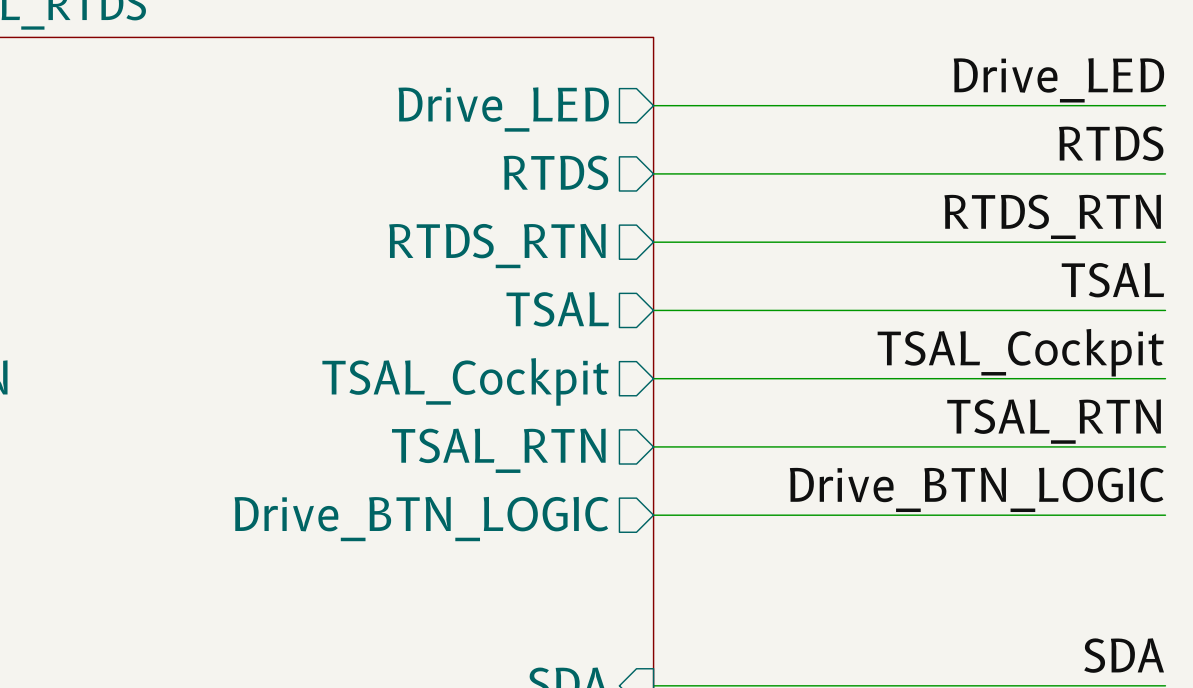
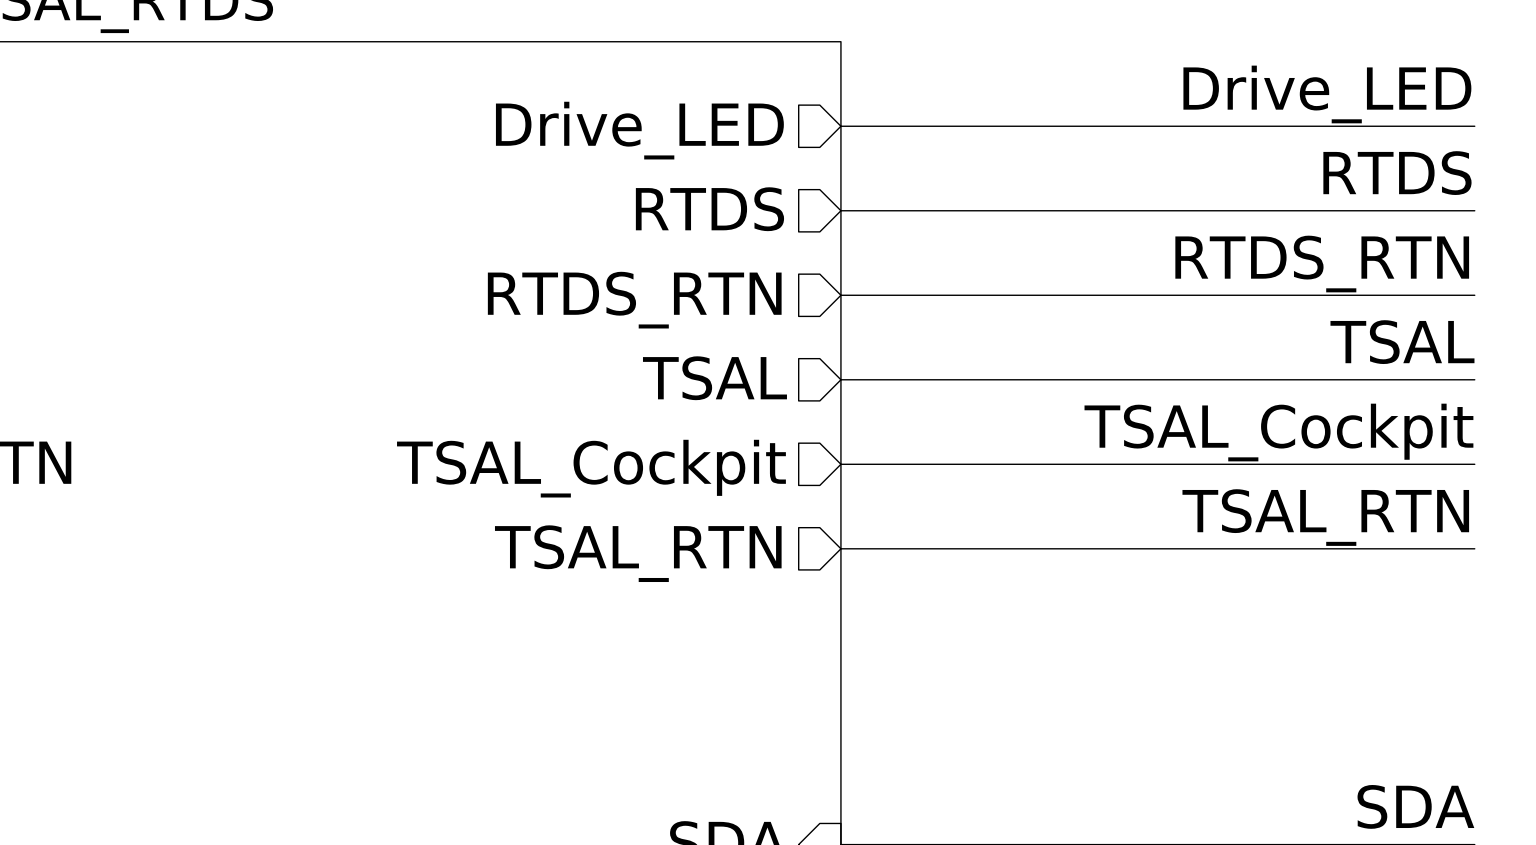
label: Drive_BTN_LOGIC (976, 489) -> none
wire: (653, 515) (1165, 515) -> none
sheet pin: Drive_BTN_LOGIC (421, 519) -> none

